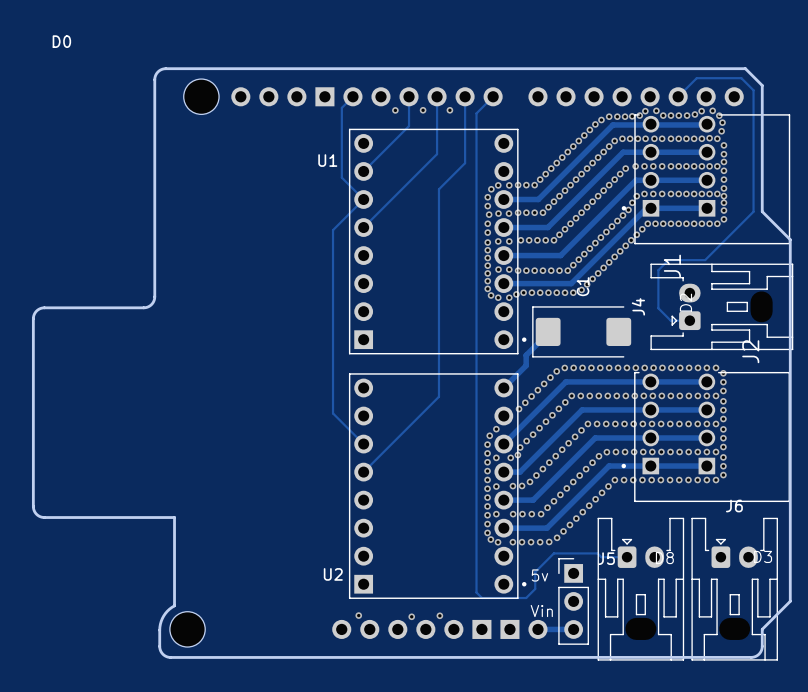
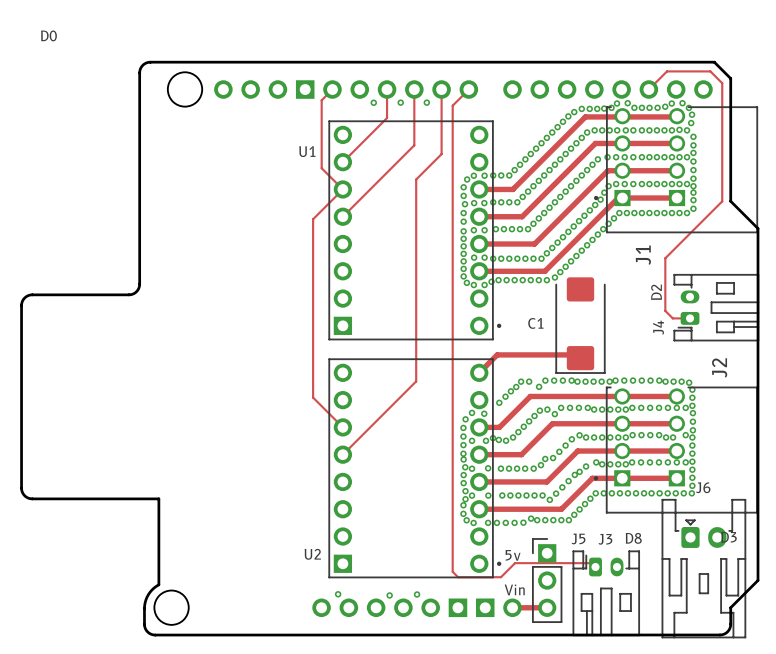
track: (705, 260) (668, 260) (658, 270) (658, 308) (670, 320) (689, 320) -> (675, 248) (665, 258) (665, 310) (672, 318) (690, 318)
J4 footprint: [650, 263, 794, 351] -> [673, 274, 759, 342]
J4 name position: J4 (638, 306) -> J4 (658, 327)
track: (548, 331) (526, 355) (526, 365) (522, 369) -> (580, 358) (577, 354) (497, 354)
C1 rotation: 0° (581, 331) -> 90° counterclockwise (580, 325)
via: (564, 367) -> none
via: (573, 367) -> none
via: (582, 367) -> none
via: (591, 367) -> none
via: (600, 367) -> none
via: (609, 367) -> none
via: (618, 367) -> none
via: (626, 367) -> none
via: (635, 367) -> none
via: (644, 367) -> none
via: (653, 367) -> none
via: (662, 367) -> none
via: (671, 367) -> none
via: (680, 367) -> none
via: (689, 367) -> none
via: (697, 367) -> none
via: (706, 367) -> none
via: (716, 367) -> none
via: (556, 371) -> none
via: (723, 373) -> none
via: (550, 377) -> none
track: (706, 381) (565, 381) (503, 444) -> (676, 396) (530, 396) (499, 427) (479, 427)
via: (723, 382) -> none
via: (544, 383) -> none
via: (537, 390) -> none
via: (723, 390) -> none
via: (607, 395) -> none
via: (616, 395) -> none
via: (625, 395) -> none
via: (634, 395) -> none
via: (697, 395) -> none
via: (706, 395) -> none
via: (716, 395) -> none
via: (531, 396) -> none
via: none -> (521, 381)
via: none -> (529, 381)
via: none -> (577, 381)
via: none -> (585, 381)
via: none -> (593, 381)
via: none -> (601, 381)
via: none -> (609, 381)
via: none -> (665, 381)
via: none -> (673, 381)
via: none -> (681, 381)
via: none -> (689, 382)
via: (723, 401) -> none
via: (525, 402) -> none
via: none -> (516, 387)
via: none -> (692, 389)
via: none -> (510, 391)
via: (558, 408) -> none
via: (519, 409) -> none
track: (706, 409) (582, 409) (519, 472) -> (676, 423) (552, 423) (521, 454) (495, 454)
via: (723, 410) -> none
via: none -> (505, 396)
via: none -> (692, 397)
via: (552, 415) -> none
via: none -> (499, 402)
via: (723, 419) -> none
via: (545, 421) -> none
via: none -> (692, 405)
via: (624, 423) -> none
via: (633, 423) -> none
via: (642, 423) -> none
via: (651, 423) -> none
via: none -> (547, 409)
via: none -> (594, 409)
via: none -> (602, 409)
via: none -> (610, 409)
via: none -> (618, 409)
via: none -> (625, 409)
via: none -> (539, 410)
via: (539, 428) -> none
via: none -> (484, 413)
via: none -> (534, 416)
via: (533, 434) -> none
via: (575, 436) -> none
J2 position: (705, 436) -> (675, 450)
via: none -> (529, 421)
track: (706, 437) (595, 437) (533, 500) -> (676, 451) (577, 451) (546, 481) (507, 481)
via: (526, 441) -> none
via: none -> (523, 426)
via: (568, 443) -> none
via: (520, 447) -> none
via: none -> (518, 432)
via: (562, 449) -> none
via: (615, 452) -> none
via: (625, 452) -> none
via: (634, 452) -> none
via: (643, 452) -> none
via: (652, 452) -> none
via: (697, 452) -> none
via: (706, 452) -> none
via: none -> (513, 437)
via: none -> (586, 437)
via: none -> (594, 437)
via: none -> (602, 437)
via: none -> (610, 437)
via: none -> (618, 437)
via: none -> (625, 437)
via: none -> (666, 437)
via: none -> (673, 437)
via: none -> (692, 437)
via: none -> (498, 439)
via: (555, 456) -> none
via: none -> (506, 440)
via: (723, 457) -> none
via: (549, 462) -> none
via: none -> (692, 445)
track: (706, 466) (609, 466) (546, 528) -> (676, 478) (592, 478) (561, 509) (521, 509)
via: (723, 466) -> none
via: (542, 469) -> none
via: none -> (692, 453)
via: (536, 475) -> none
via: (723, 475) -> none
via: none -> (545, 458)
via: none -> (463, 459)
via: (487, 479) -> none
via: none -> (692, 461)
via: (614, 480) -> none
via: (633, 480) -> none
via: (642, 480) -> none
via: (651, 480) -> none
via: (530, 481) -> none
via: none -> (540, 465)
via: (573, 482) -> none
via: none -> (602, 464)
via: none -> (610, 464)
via: none -> (618, 464)
via: none -> (625, 464)
via: none -> (586, 466)
via: none -> (465, 467)
via: (522, 485) -> none
via: none -> (500, 468)
via: none -> (509, 468)
via: none -> (517, 468)
via: none -> (525, 468)
via: none -> (533, 468)
via: (608, 486) -> none
via: none -> (692, 469)
via: (487, 488) -> none
via: (566, 488) -> none
via: none -> (579, 471)
via: none -> (463, 475)
via: (560, 494) -> none
via: none -> (692, 477)
via: (487, 497) -> none
via: none -> (463, 483)
via: (553, 501) -> none
via: none -> (692, 485)
via: (487, 506) -> none
via: (547, 507) -> none
via: none -> (465, 491)
via: none -> (595, 493)
via: none -> (603, 493)
via: none -> (611, 493)
via: none -> (619, 493)
via: none -> (627, 493)
via: none -> (636, 493)
via: none -> (644, 493)
via: none -> (651, 493)
via: none -> (659, 493)
via: none -> (667, 493)
via: none -> (675, 493)
via: none -> (683, 493)
via: none -> (691, 493)
via: (522, 514) -> none
via: none -> (502, 495)
via: (531, 514) -> none
via: none -> (510, 495)
via: (541, 514) -> none
via: none -> (518, 495)
via: none -> (526, 495)
via: none -> (534, 495)
via: none -> (542, 495)
via: (487, 515) -> none
via: none -> (465, 499)
via: none -> (590, 498)
via: none -> (585, 504)
via: (569, 524) -> none
via: none -> (579, 509)
via: (563, 531) -> none
via: none -> (574, 514)
via: none -> (537, 520)
via: none -> (545, 520)
via: none -> (553, 520)
via: none -> (561, 520)
via: none -> (568, 520)
track: (627, 557) (601, 557) (597, 553) (553, 553) (535, 572) (535, 588) -> (595, 567) (591, 563) (515, 563) (509, 568)
part: (640, 589) -> none
J3: none -> (606, 593)

